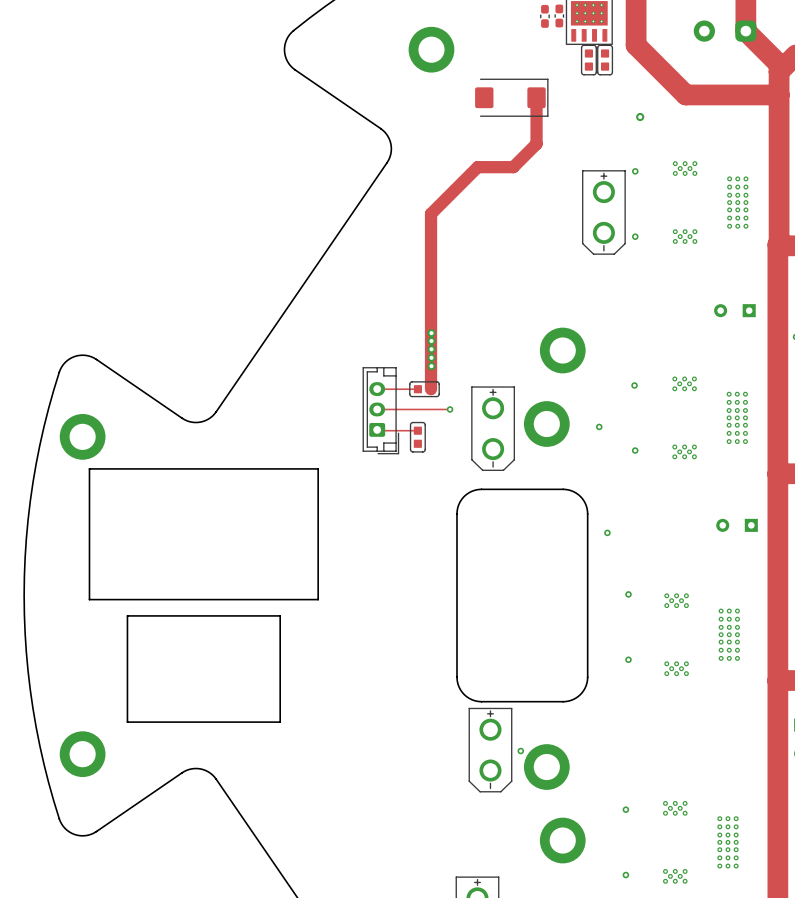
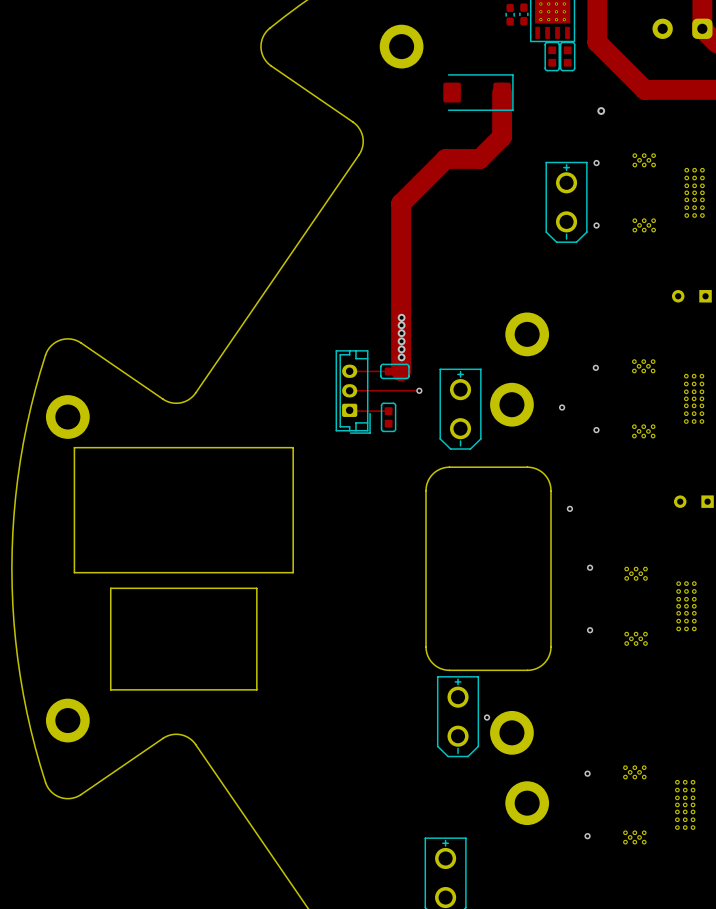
track width: thin (536, 97) (536, 143) (513, 167) (477, 167) (431, 213) (431, 389) -> thick (502, 92) (502, 136) (479, 158) (445, 158) (401, 203) (401, 371)
via: none -> (401, 357)

